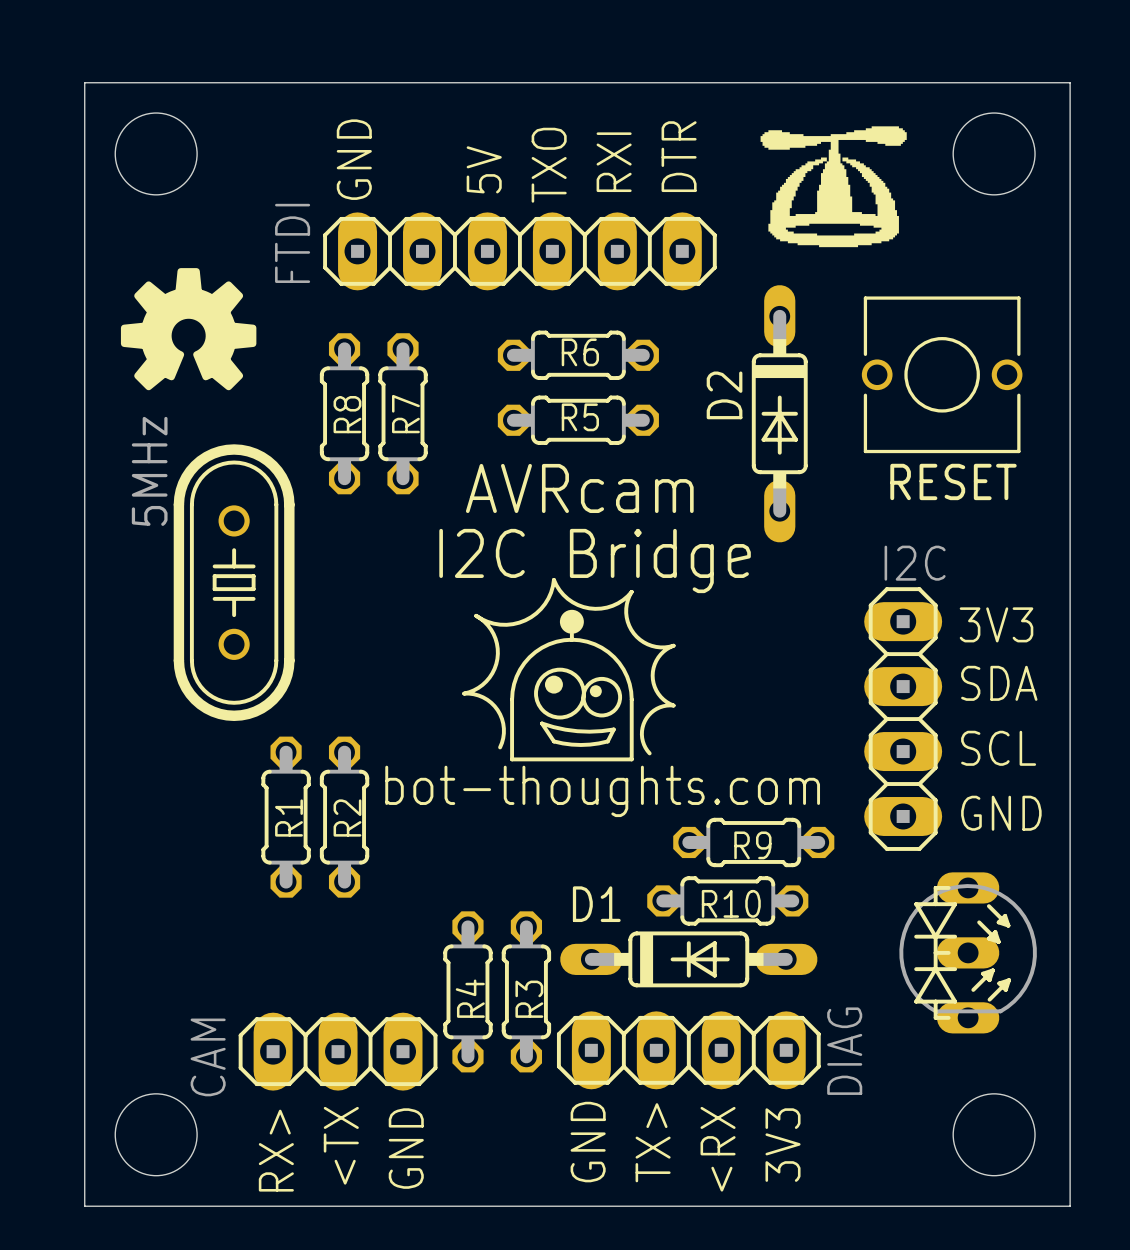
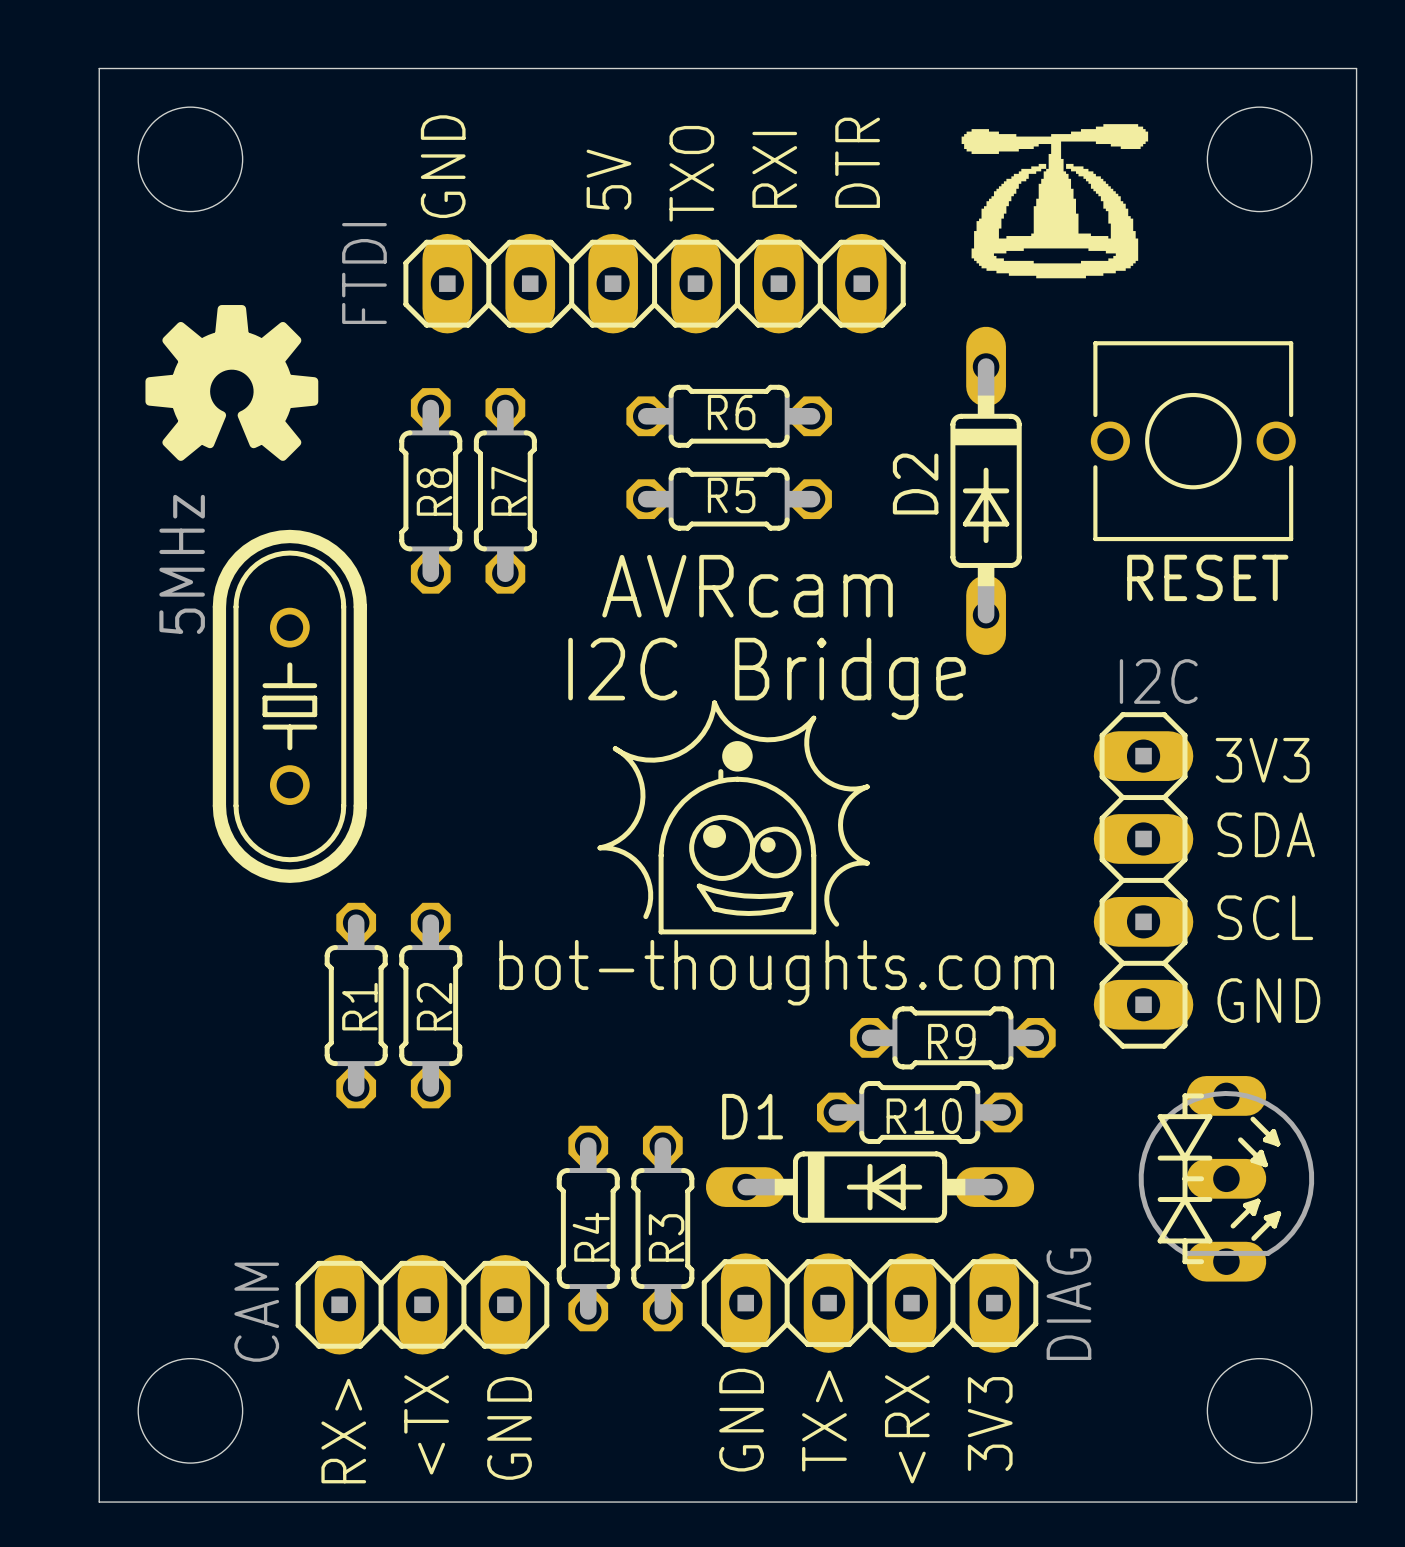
D2 name position: D2 (724, 395) -> D2 (915, 484)
text position: AVRcam (579, 488) -> AVRcam (747, 586)
text position: I2C Bridge (595, 560) -> I2C Bridge (767, 678)
drawing position: (571, 621) -> (737, 756)
drawing position: (553, 684) -> (714, 836)
drawing position: (595, 691) -> (767, 844)
drawing position: (559, 693) -> (722, 847)
drawing position: (601, 697) -> (775, 852)
line: (541, 723) (553, 741) (571, 744) (589, 744) (607, 741) (613, 729) (577, 731) (541, 723) -> (699, 886) (714, 908) (737, 913) (760, 913) (783, 908) (790, 893) (744, 895) (699, 886)
line: (500, 747) (503, 728) (497, 710) (483, 697) (464, 693) (478, 687) (486, 681) (492, 673) (497, 658) (496, 643) (493, 634) (487, 625) (476, 615) (487, 621) (500, 624) (513, 624) (525, 620) (536, 613) (545, 603) (551, 592) (553, 579) (559, 590) (567, 598) (577, 605) (589, 608) (601, 608) (612, 605) (623, 600) (631, 591) (626, 604) (626, 613) (629, 625) (633, 633) (643, 642) (651, 645) (660, 647) (673, 645) (660, 654) (653, 667) (652, 679) (656, 690) (663, 699) (673, 705) (656, 708) (644, 721) (642, 738) (649, 753) -> (645, 916) (649, 904) (650, 892) (648, 880) (642, 869) (634, 859) (624, 852) (612, 848) (600, 847) (618, 840) (628, 832) (635, 822) (642, 803) (641, 784) (637, 771) (630, 761) (615, 748) (629, 756) (645, 759) (662, 759) (678, 754) (692, 745) (703, 733) (710, 718) (714, 702) (721, 716) (732, 727) (745, 734) (759, 739) (774, 739) (789, 735) (802, 728) (813, 718) (807, 733) (806, 745) (810, 761) (816, 771) (829, 782) (839, 787) (850, 789) (867, 786) (850, 797) (841, 815) (840, 829) (845, 844) (854, 855) (867, 863) (858, 863) (845, 867) (838, 872) (830, 883) (827, 891) (827, 904) (831, 917) (836, 924)
line: (525, 759) (512, 759) (512, 699) (516, 676) (524, 663) (535, 652) (556, 641) (571, 639) (587, 641) (601, 647) (614, 657) (623, 669) (631, 691) (631, 759) -> (661, 931) (661, 845) (671, 817) (683, 801) (699, 789) (717, 781) (737, 779) (757, 781) (783, 794) (798, 809) (807, 826) (813, 855) (813, 931) (797, 931)
text position: bot-thoughts.com (602, 791) -> bot-thoughts.com (776, 972)

